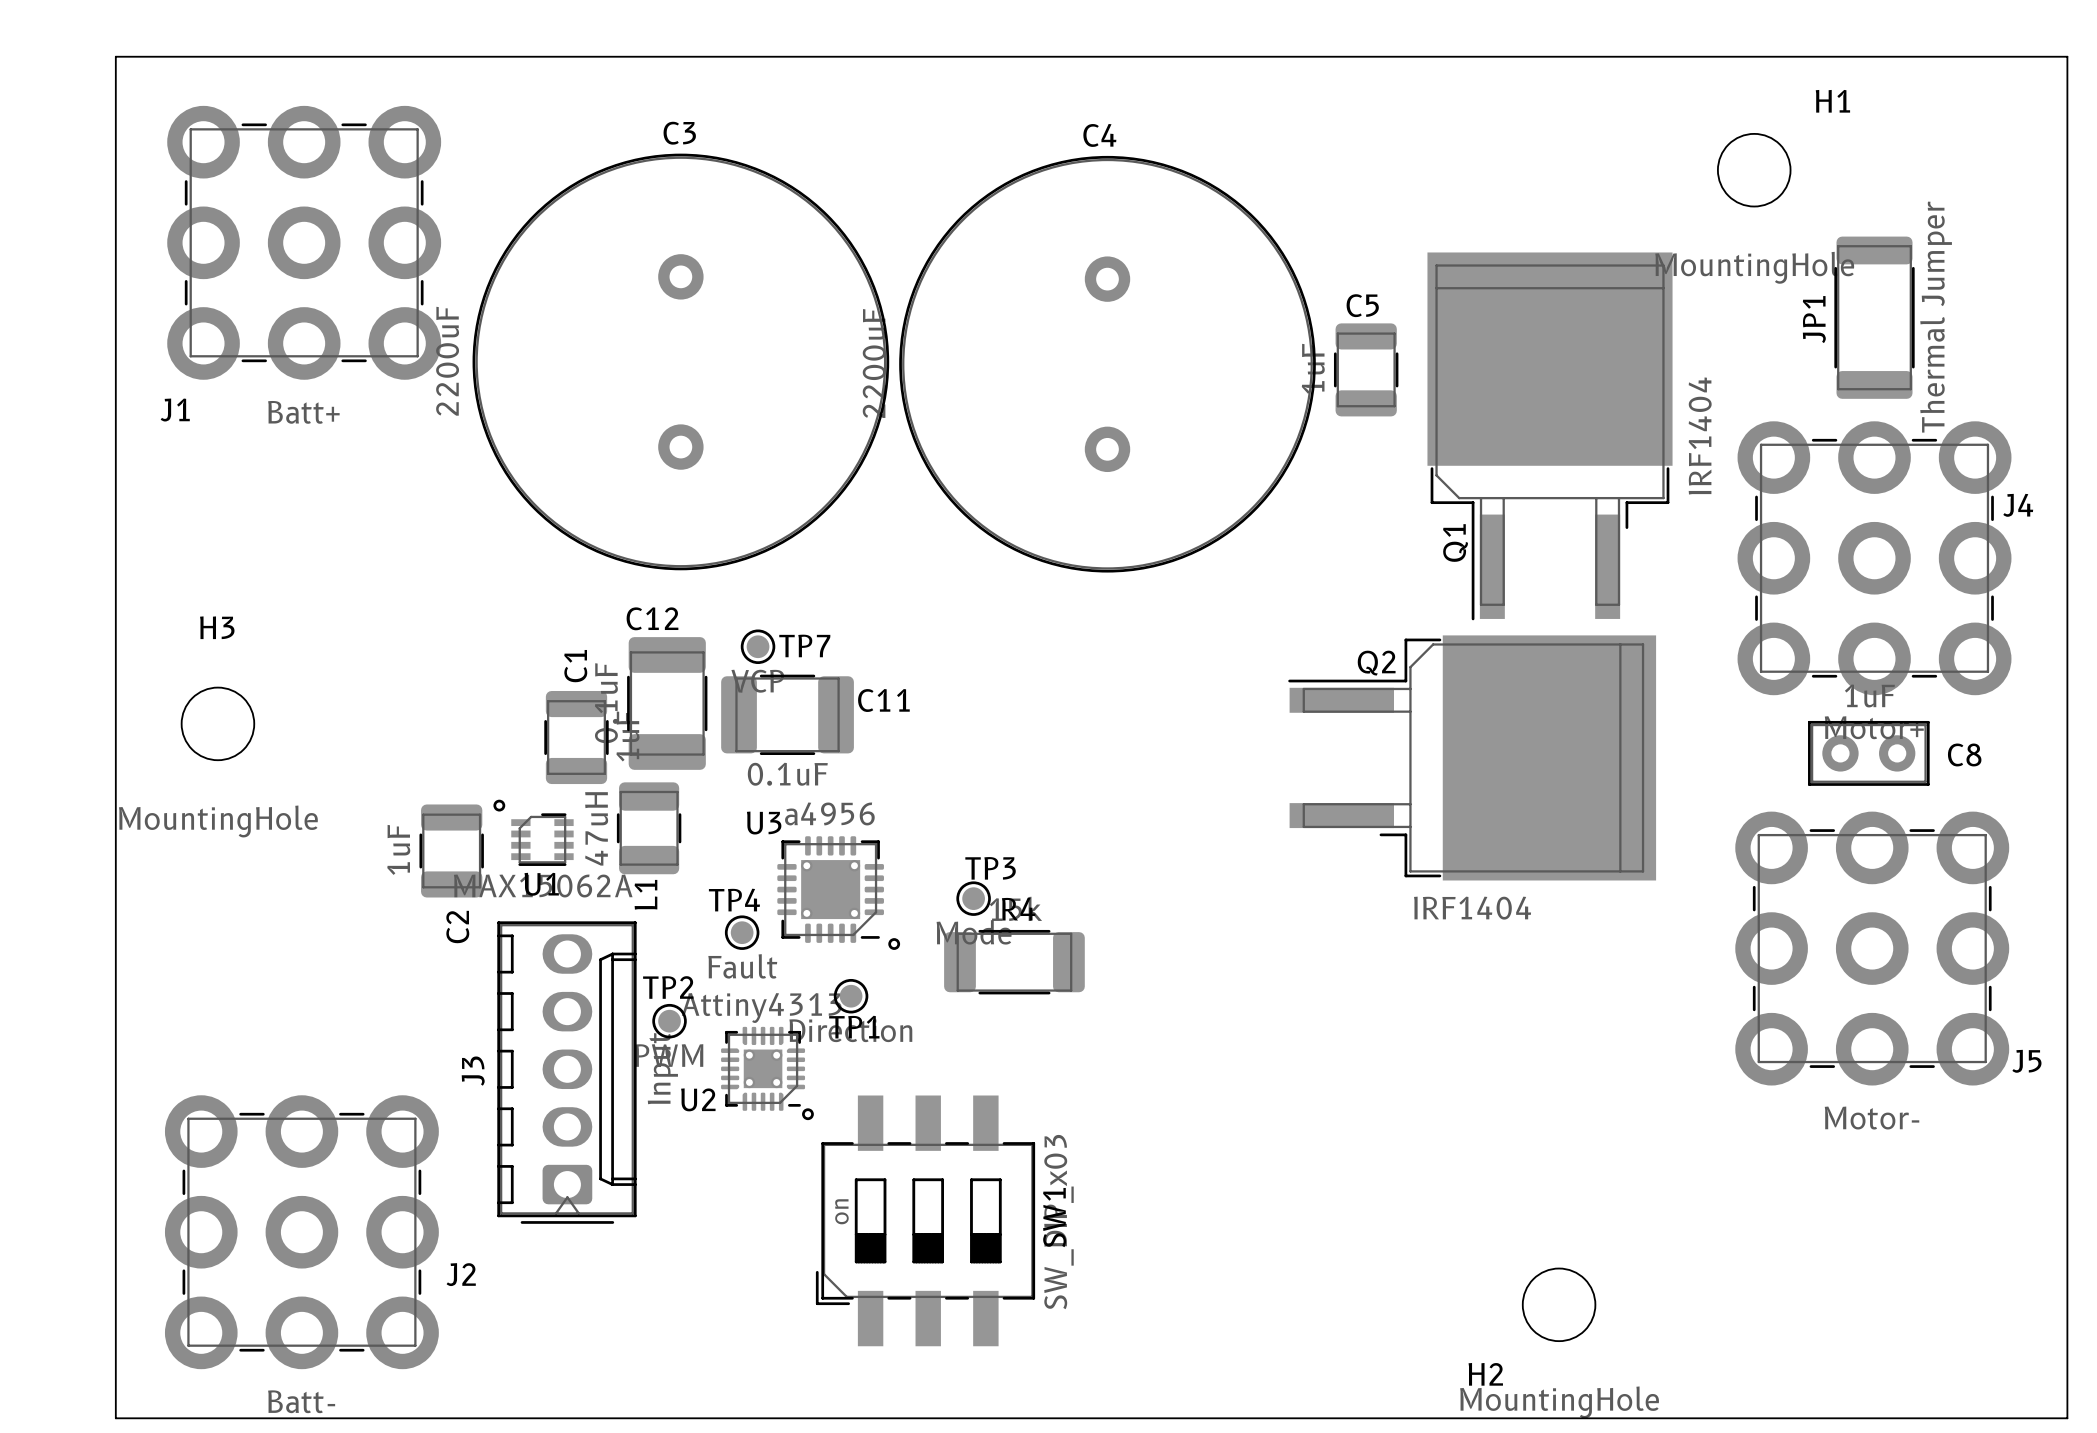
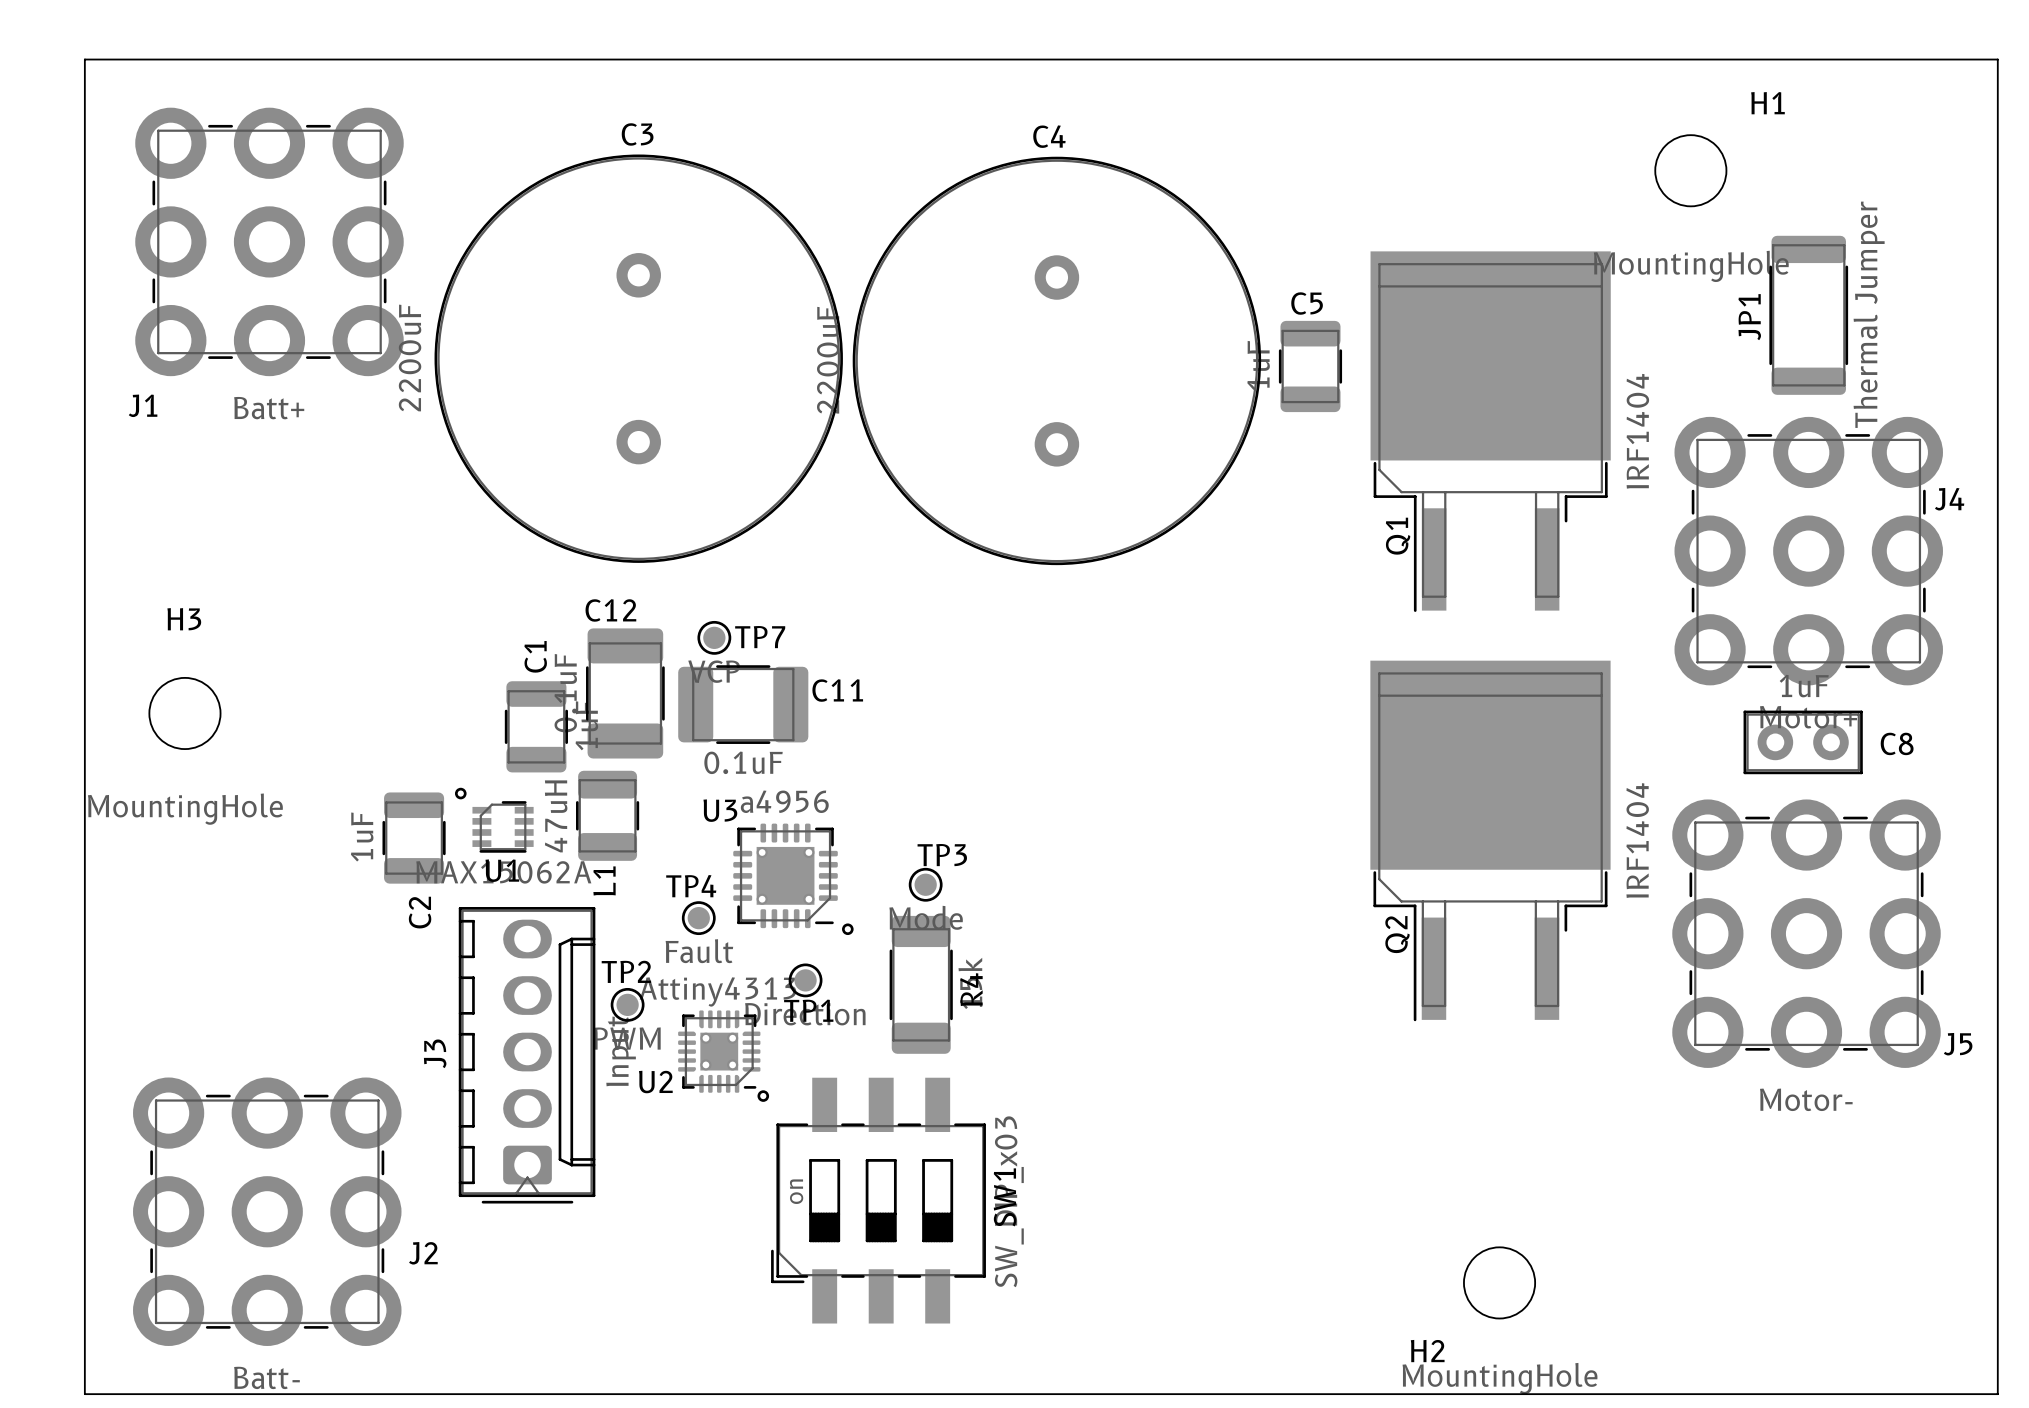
Q2 rotation: 0° (1472, 757) -> 90° counterclockwise (1490, 840)
R4 rotation: 0° (1014, 962) -> 90° clockwise (921, 984)

